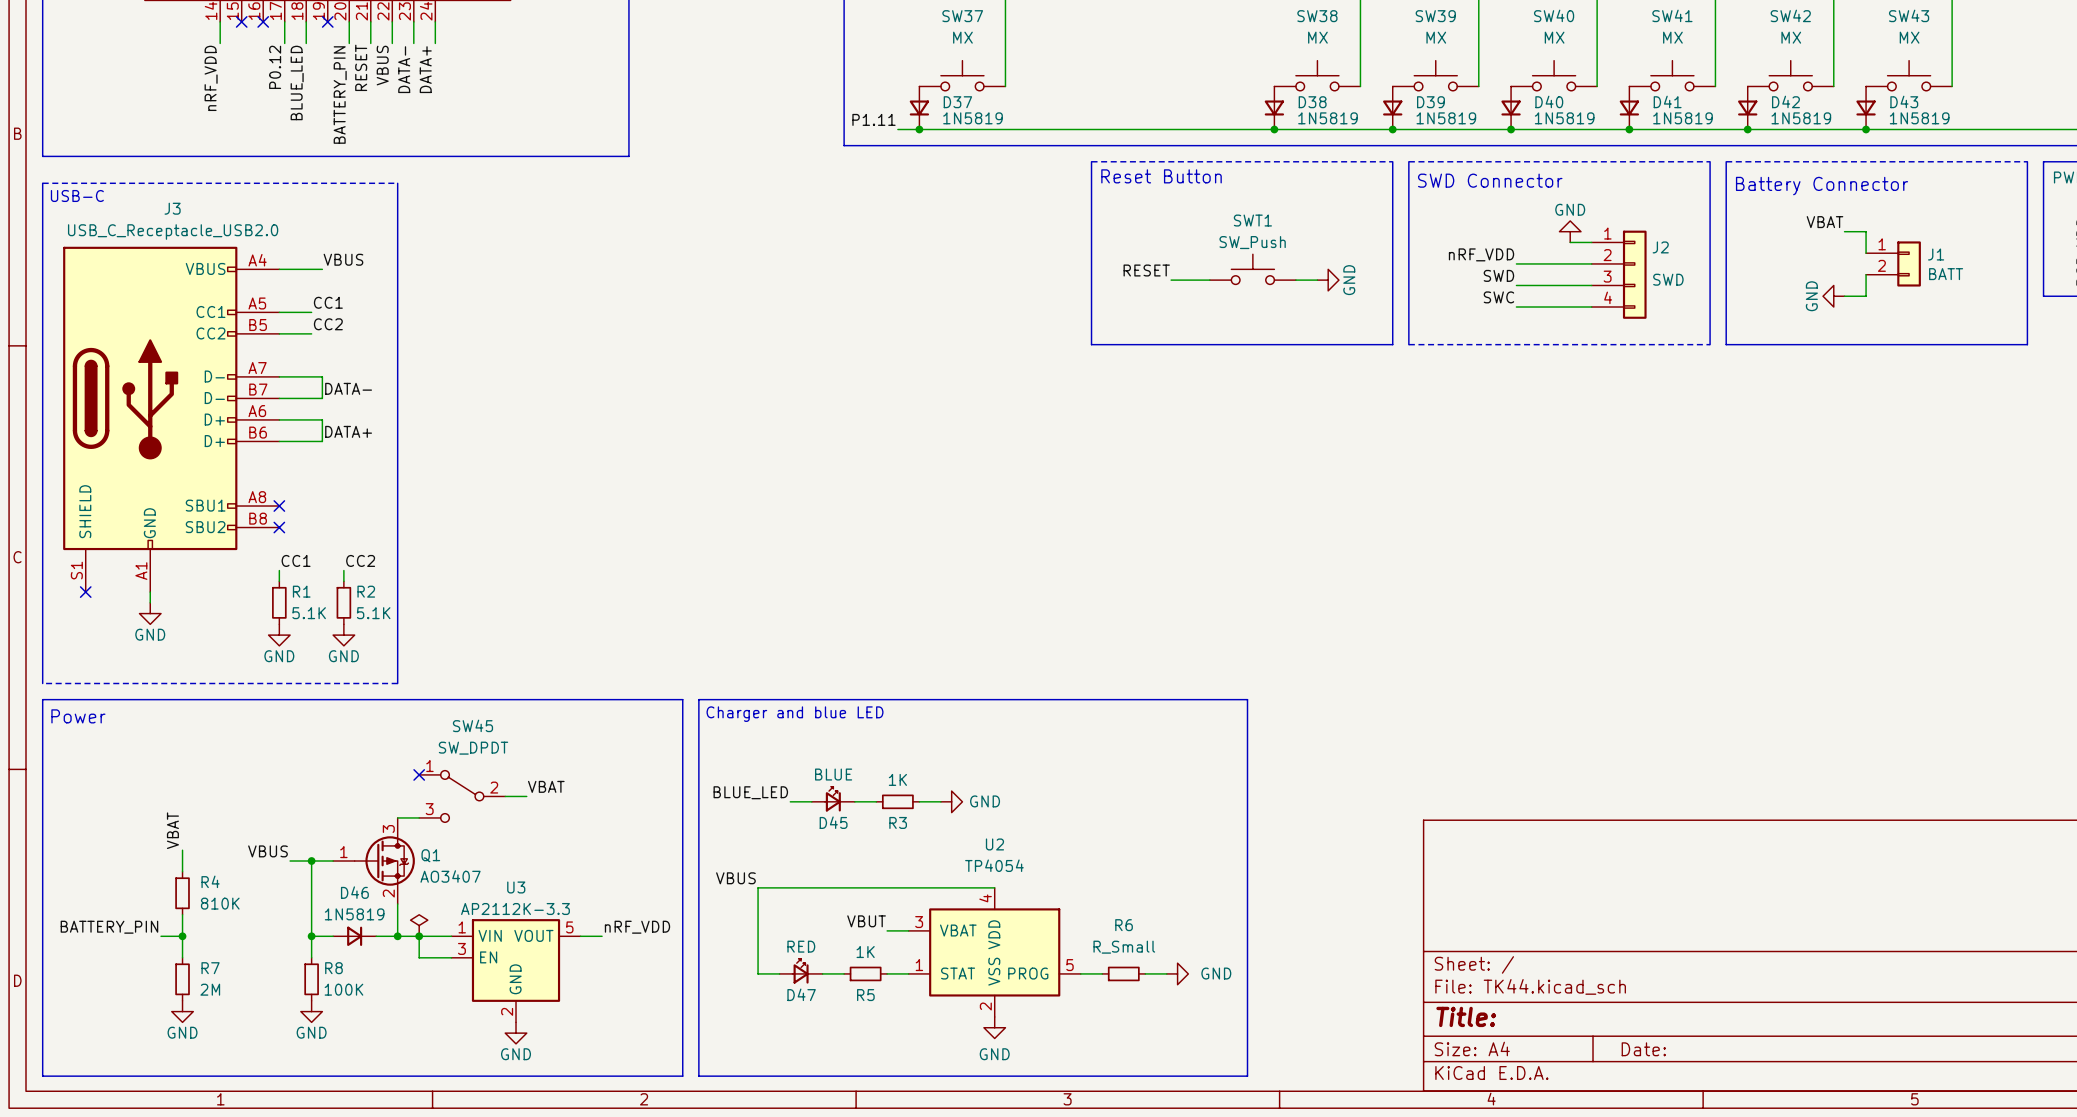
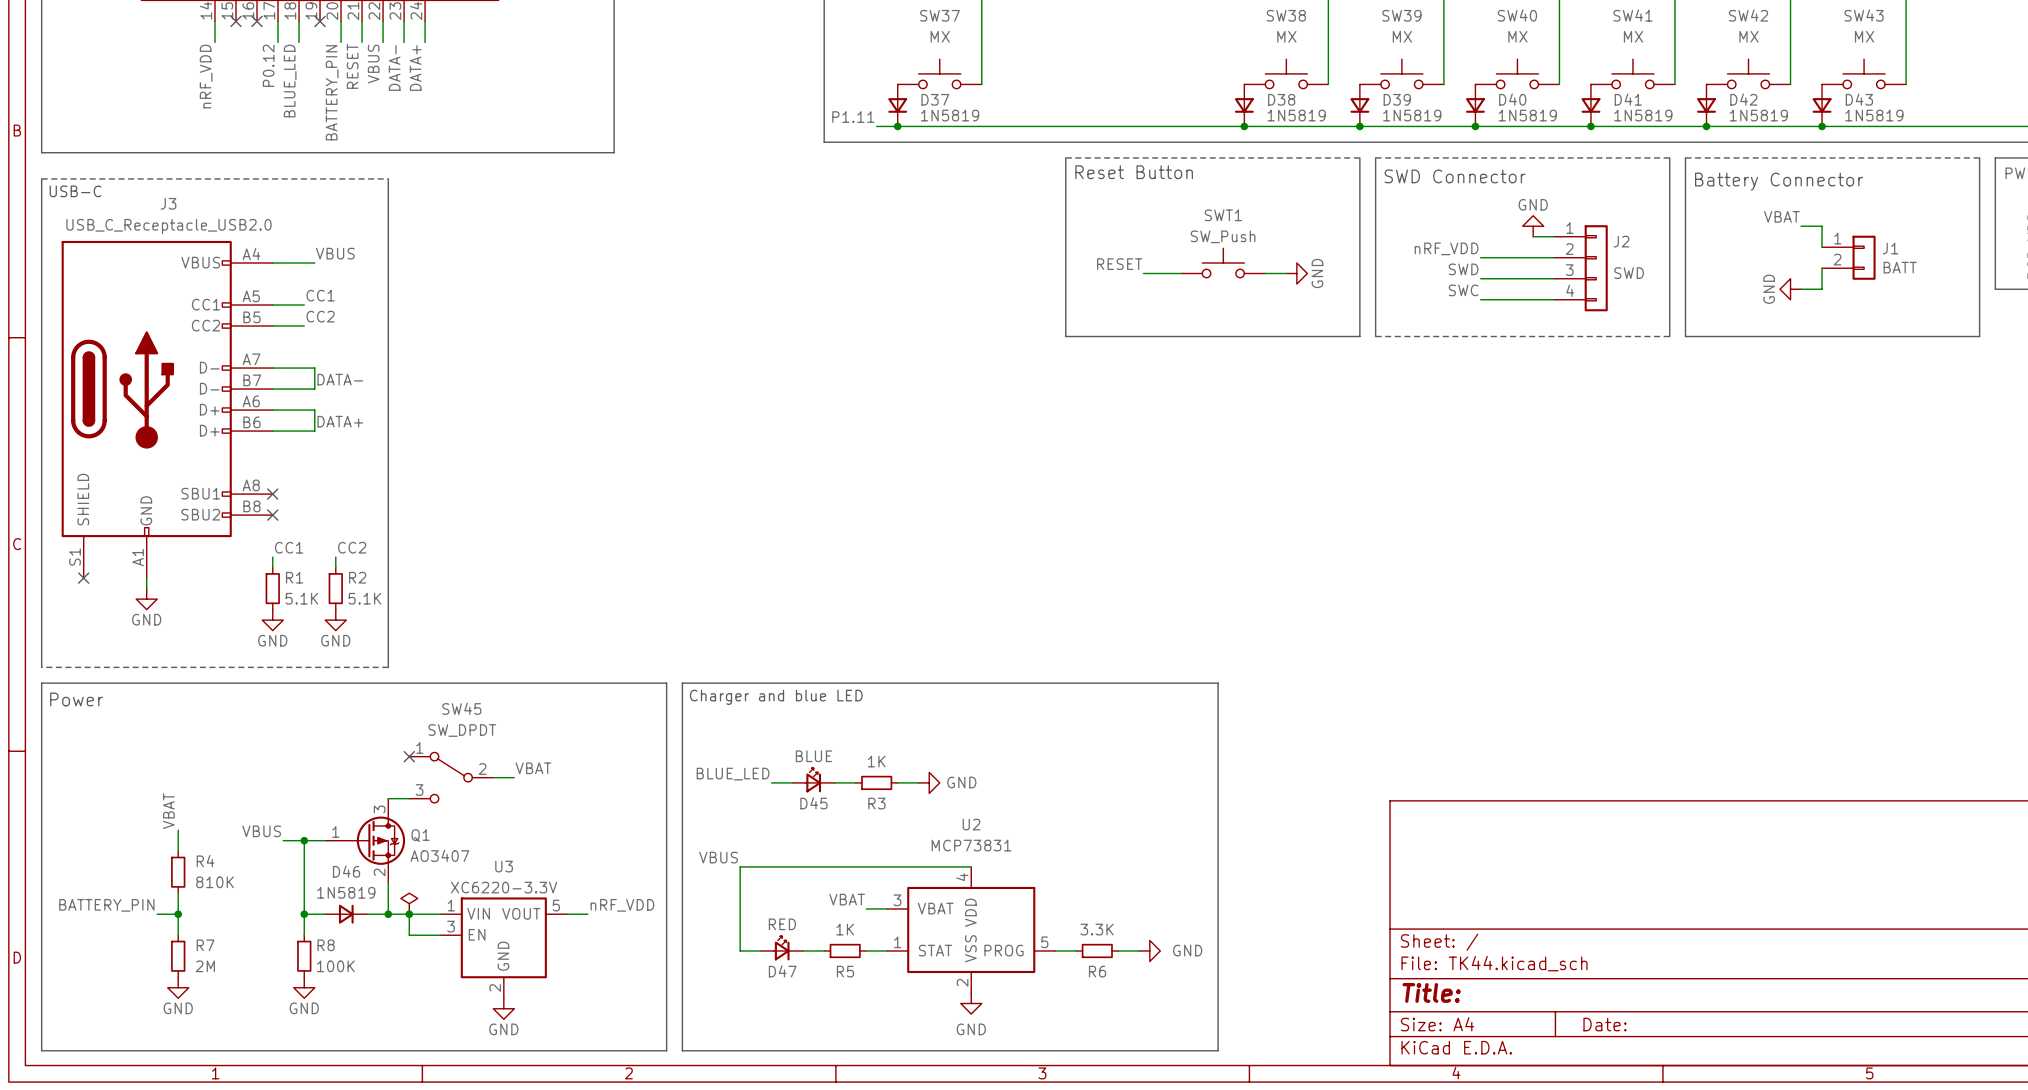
U2 value: TP4054 (994, 865) -> MCP73831 (971, 845)
U3 value: AP2112K-3.3 (515, 909) -> XC6220-3.3V (504, 887)
label: VBUT (866, 921) -> VBAT (847, 899)
R6 name position: R6 (1124, 925) -> R6 (1097, 971)
R6 value: R_Small (1124, 947) -> 3.3K (1097, 929)

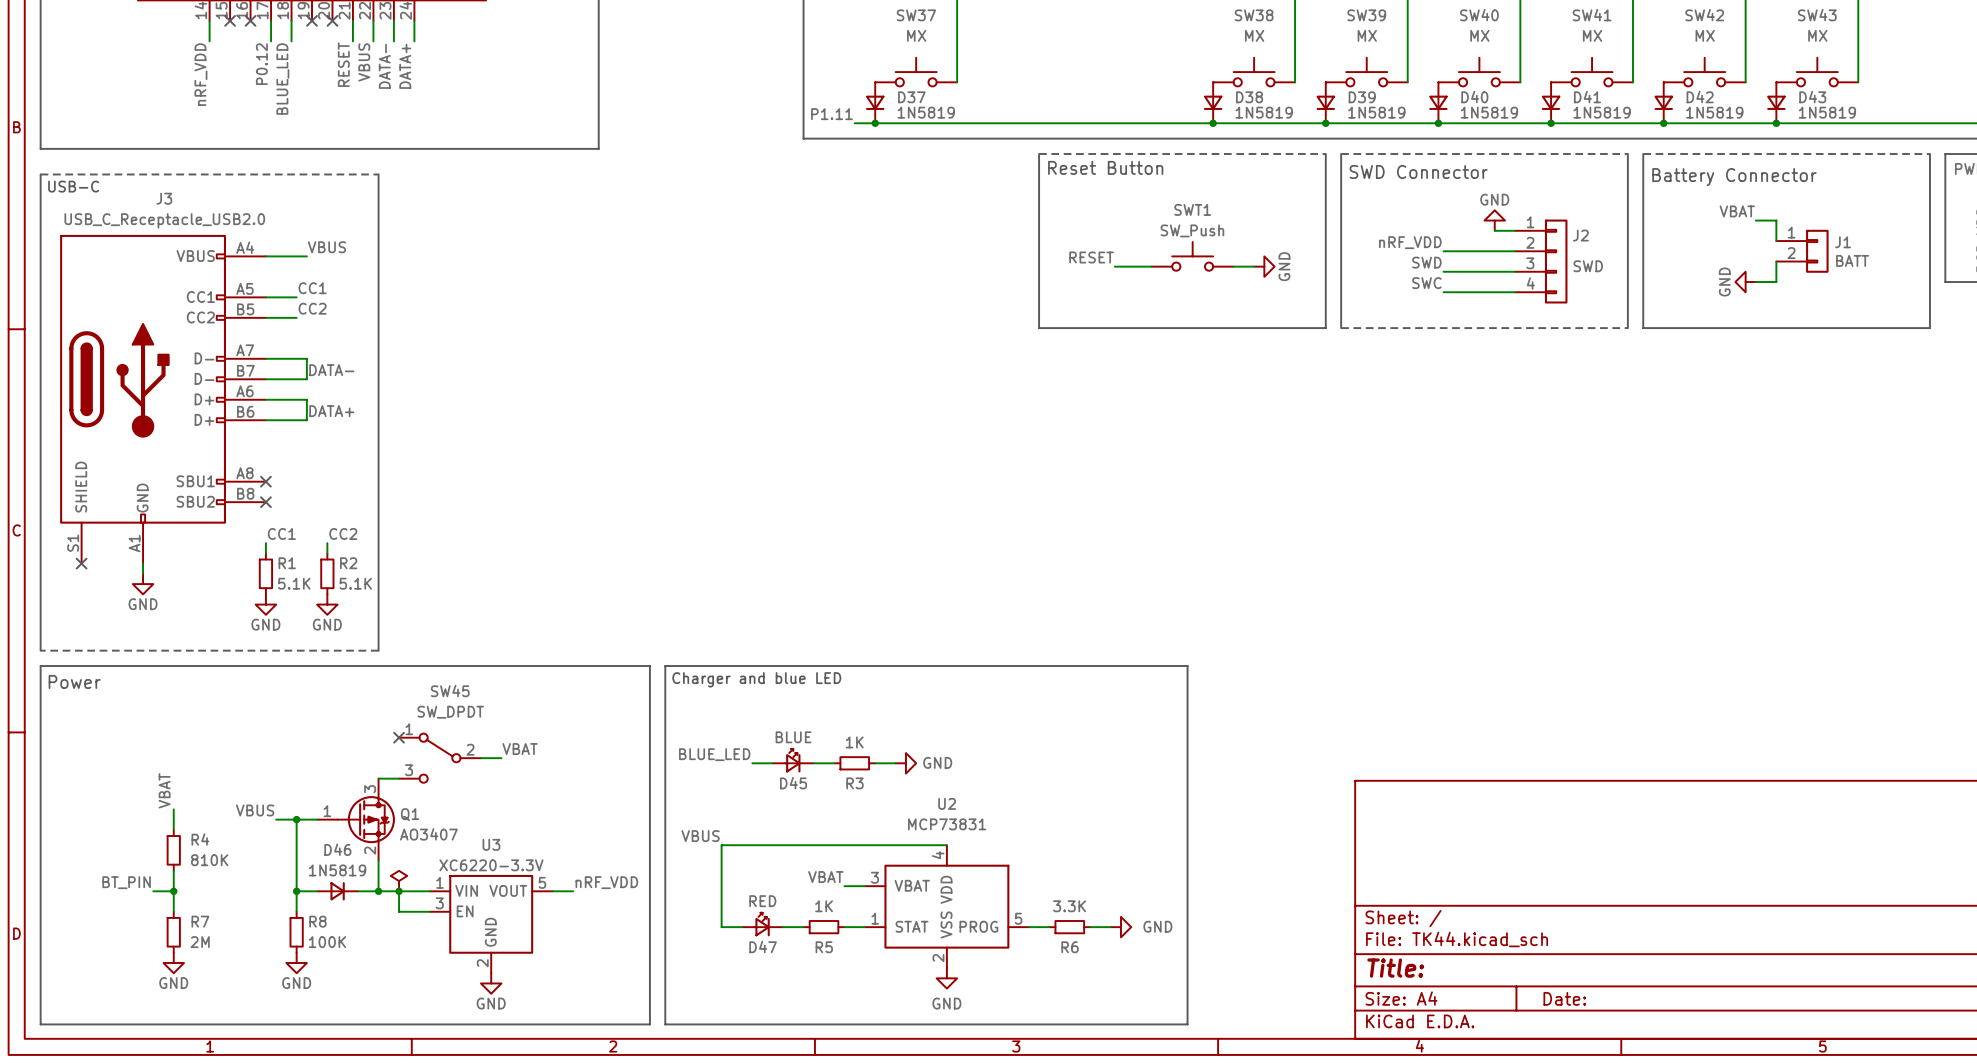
wire: (341, 21) (341, 42) -> none
no-connect mark: none -> (332, 20)
label: BATTERY_PIN (332, 92) -> none
label: BATTERY_PIN (106, 905) -> BT_PIN (126, 882)

